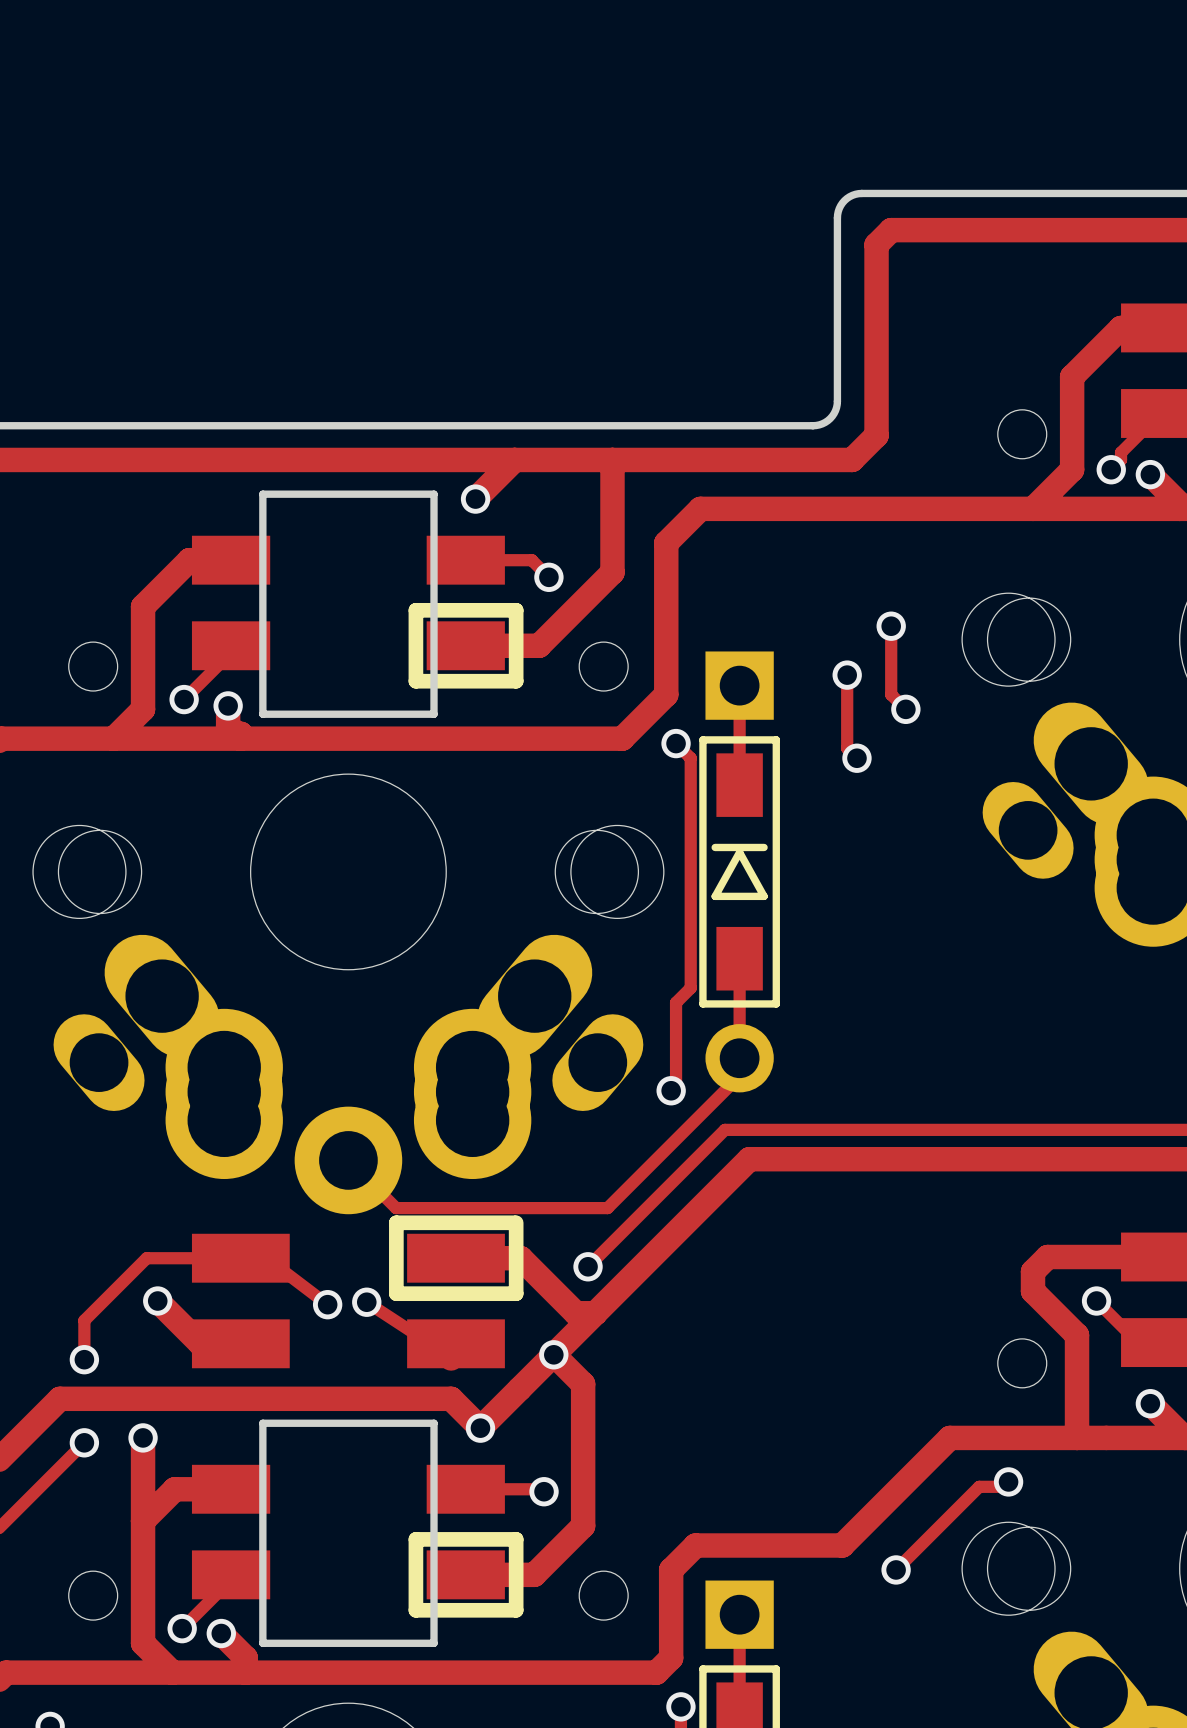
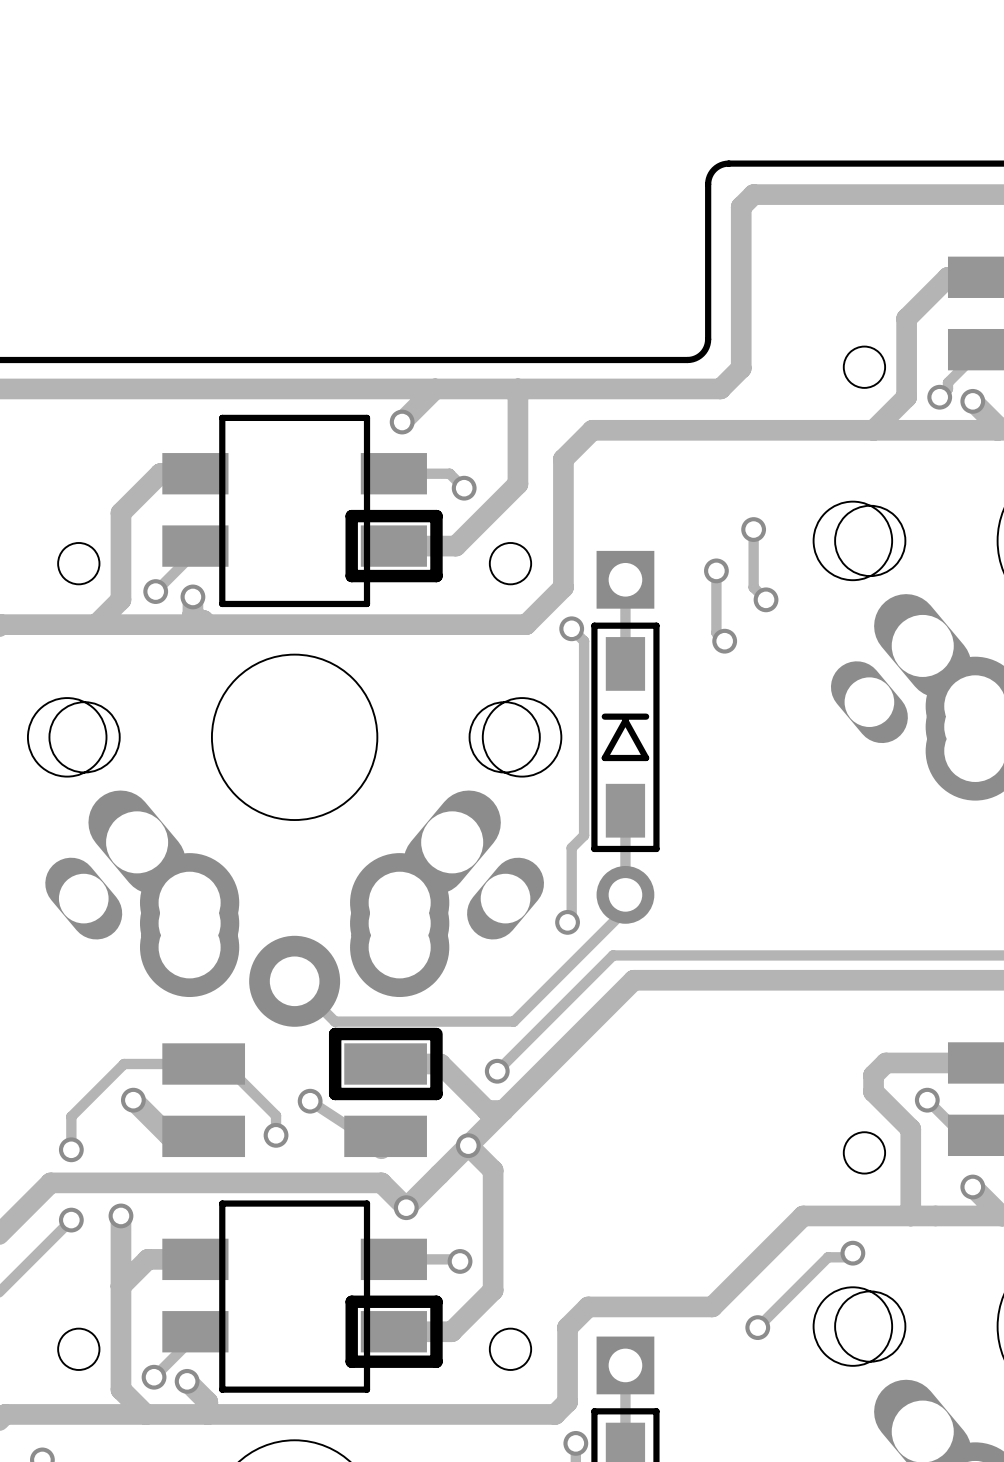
track: (266, 1258) (327, 1304) -> (224, 1063) (276, 1115) (276, 1135)
via position: (327, 1304) -> (276, 1135)

